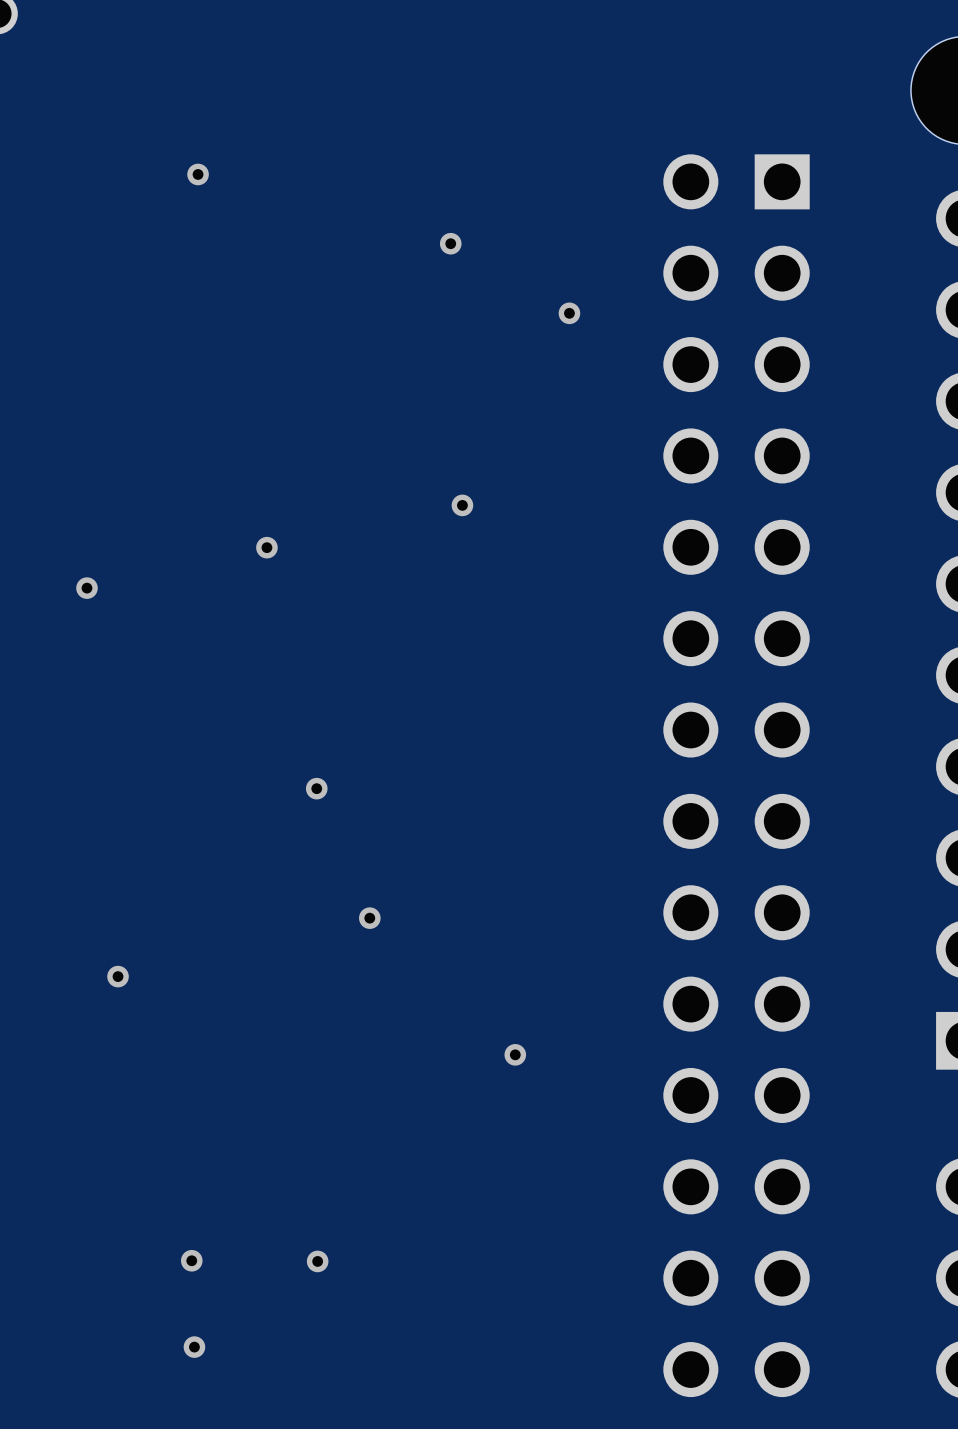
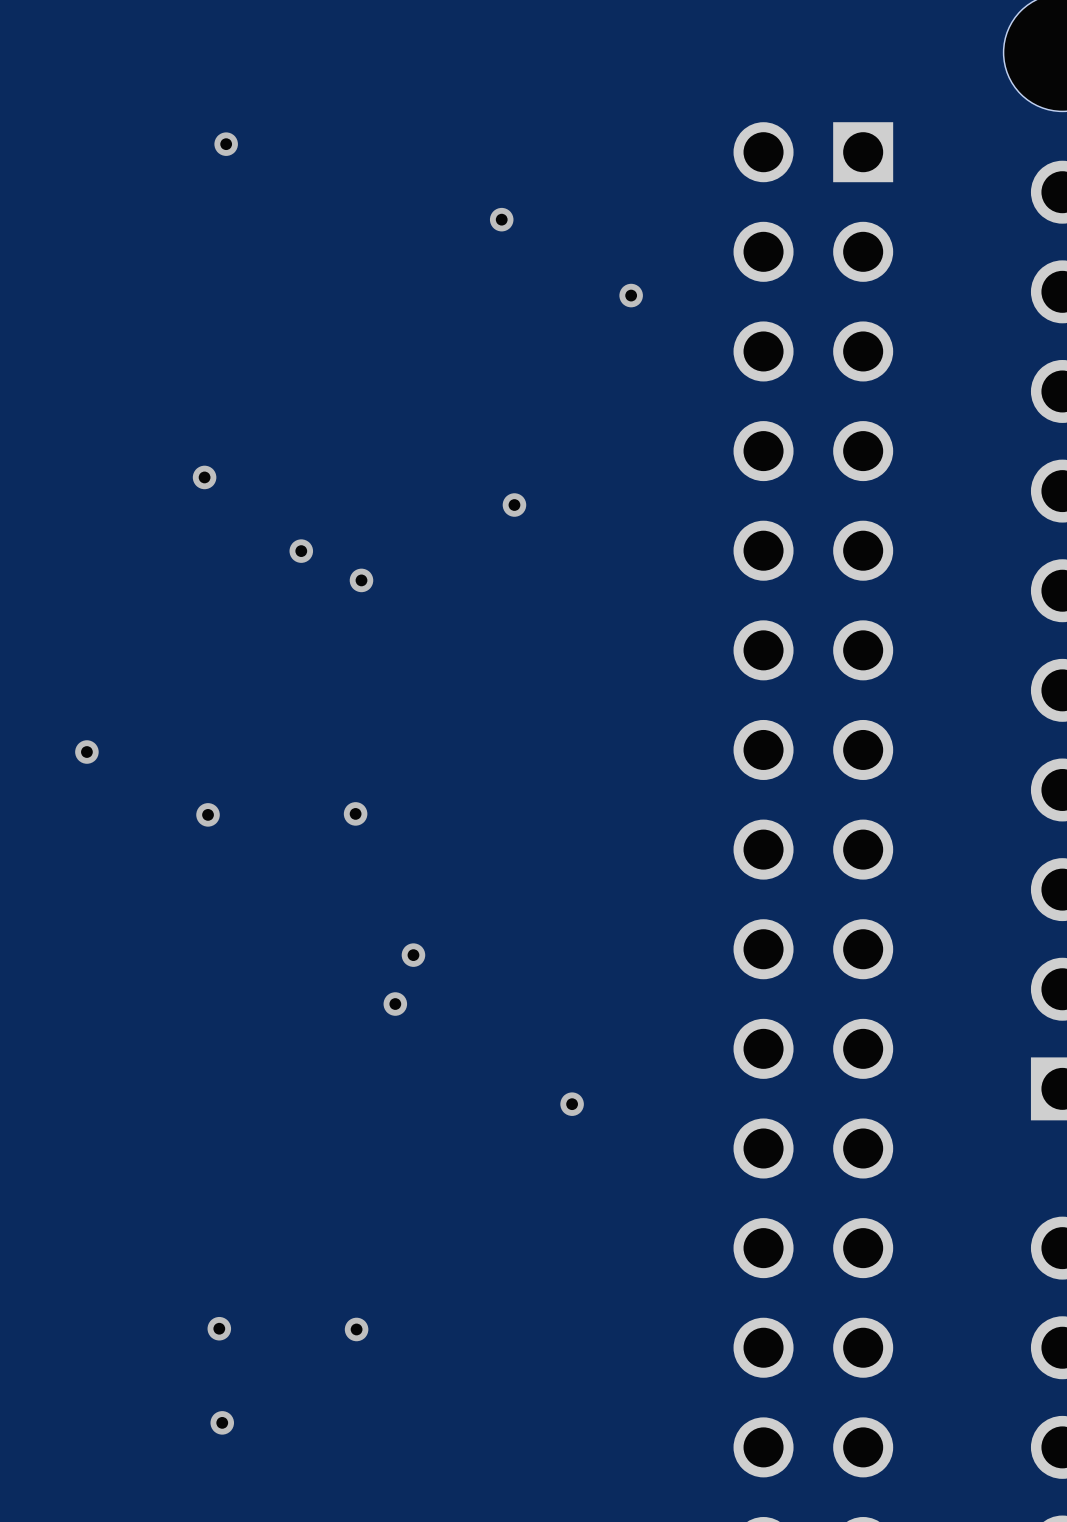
via: none -> (204, 477)
via: none -> (361, 580)
via: (86, 588) -> none
via: none -> (86, 752)
via: none -> (208, 814)
via: none -> (395, 1004)
via: (118, 976) -> none

